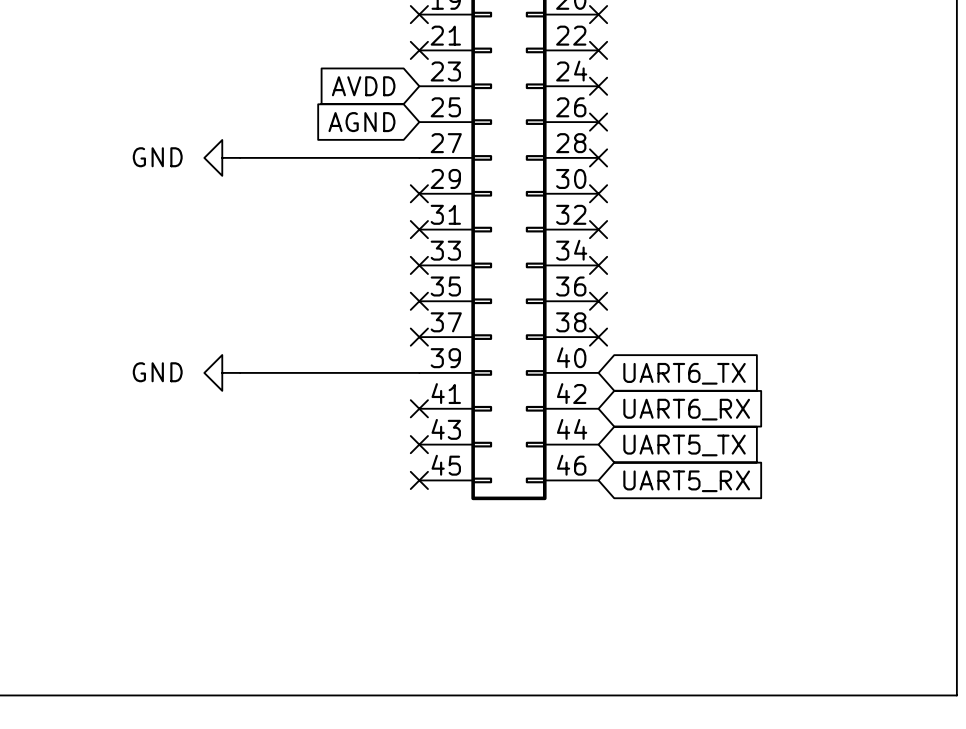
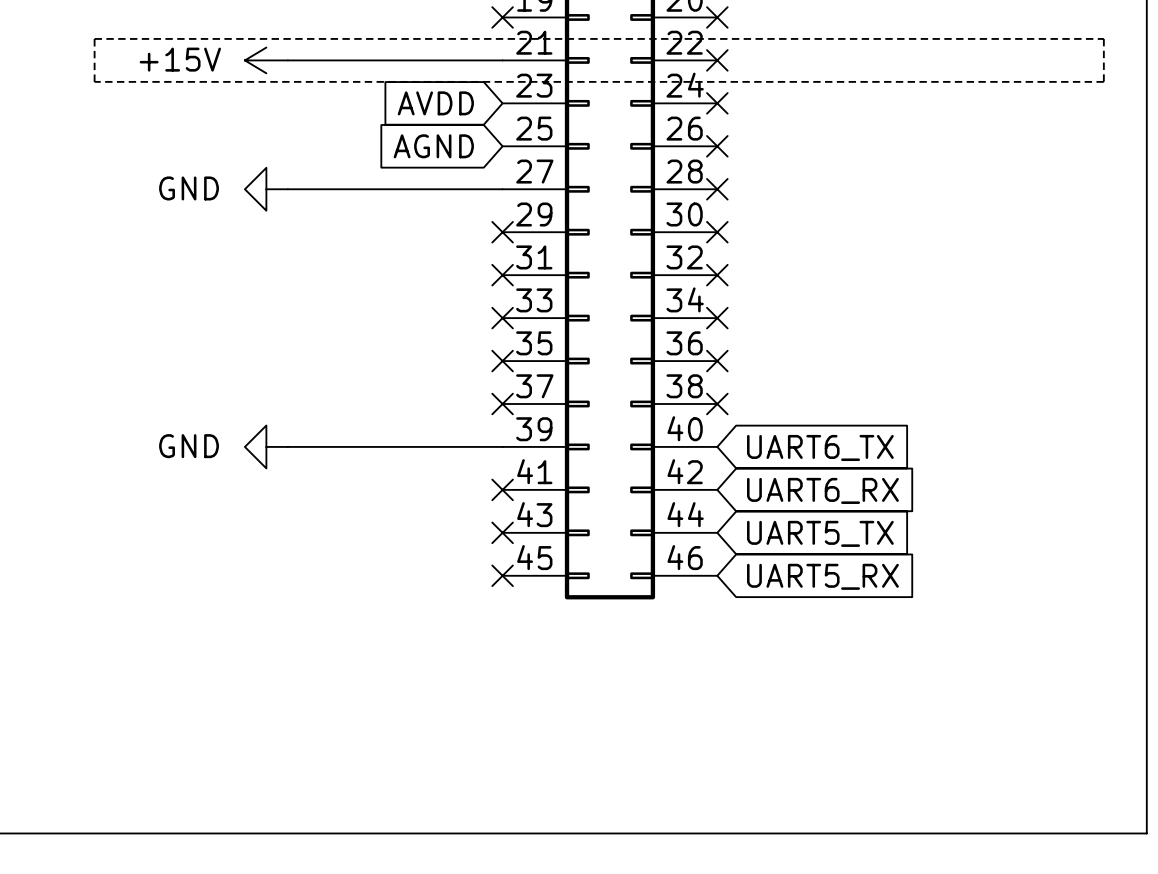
line: none -> (94, 38) (1103, 38) (1103, 81) (94, 81) (94, 38)
power symbol: none -> +15V (266, 60)
wire: none -> (287, 60) (502, 60)
no-connect mark: (419, 50) -> none

